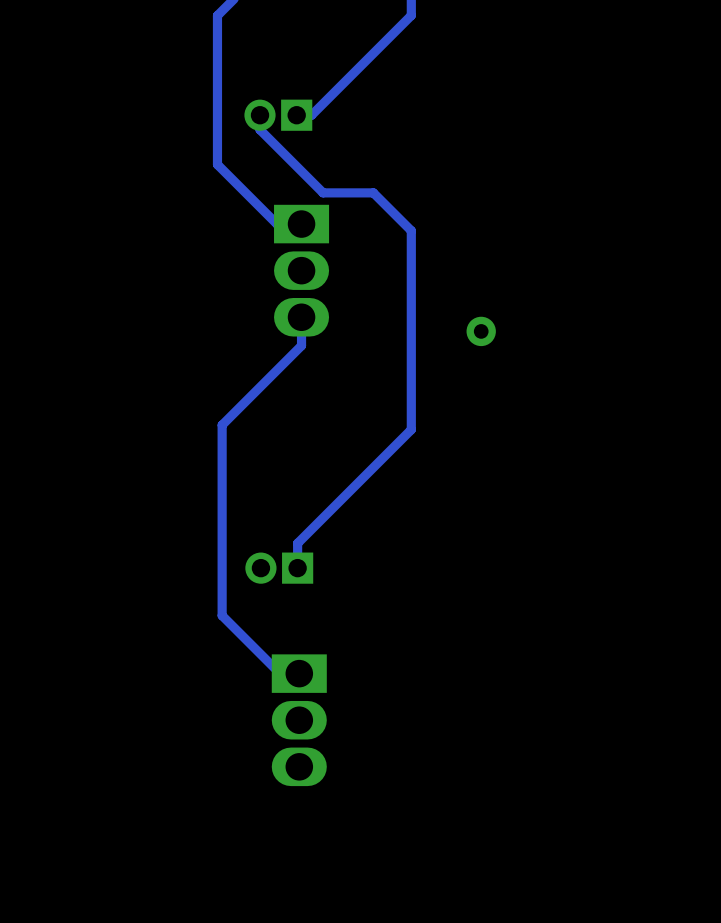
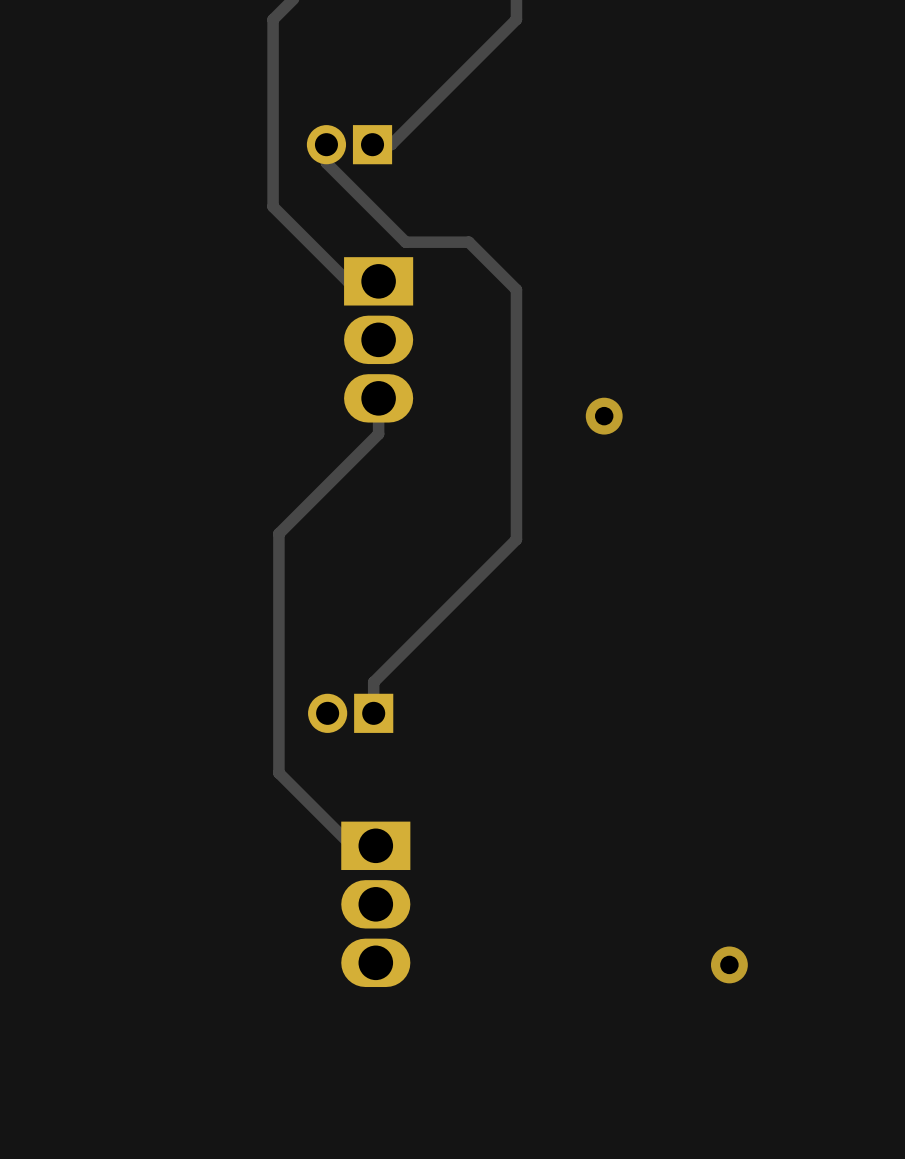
via: none -> (729, 964)

